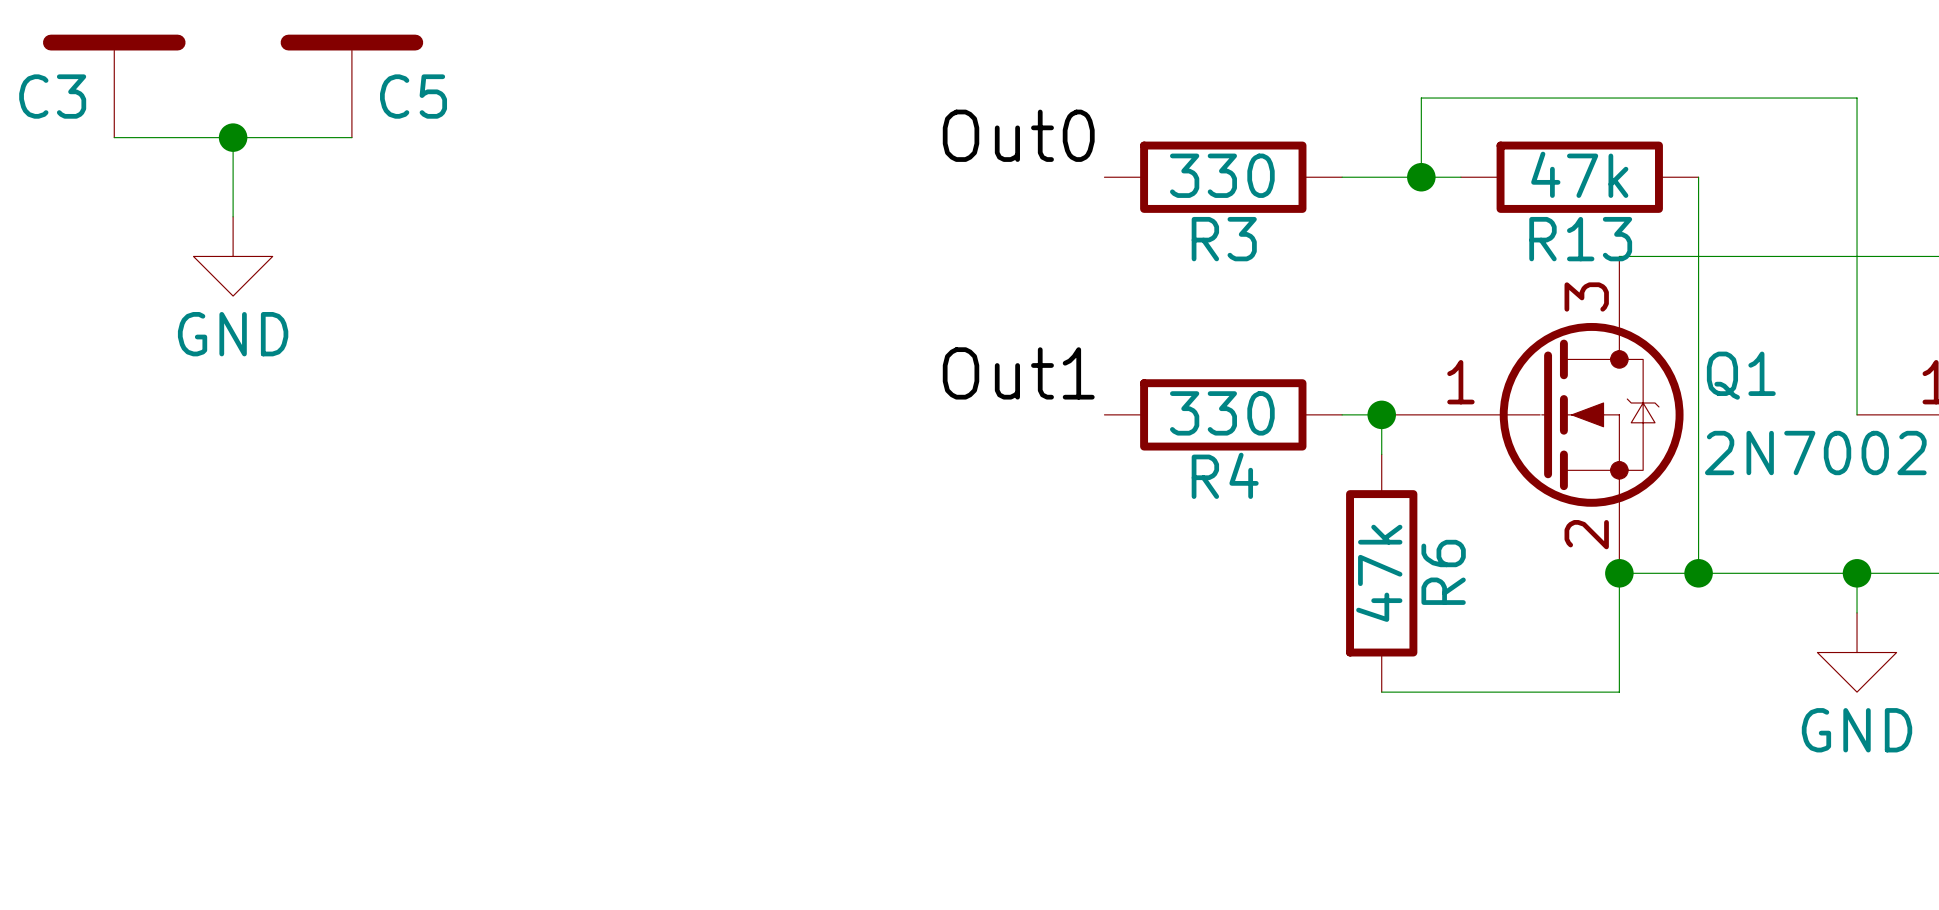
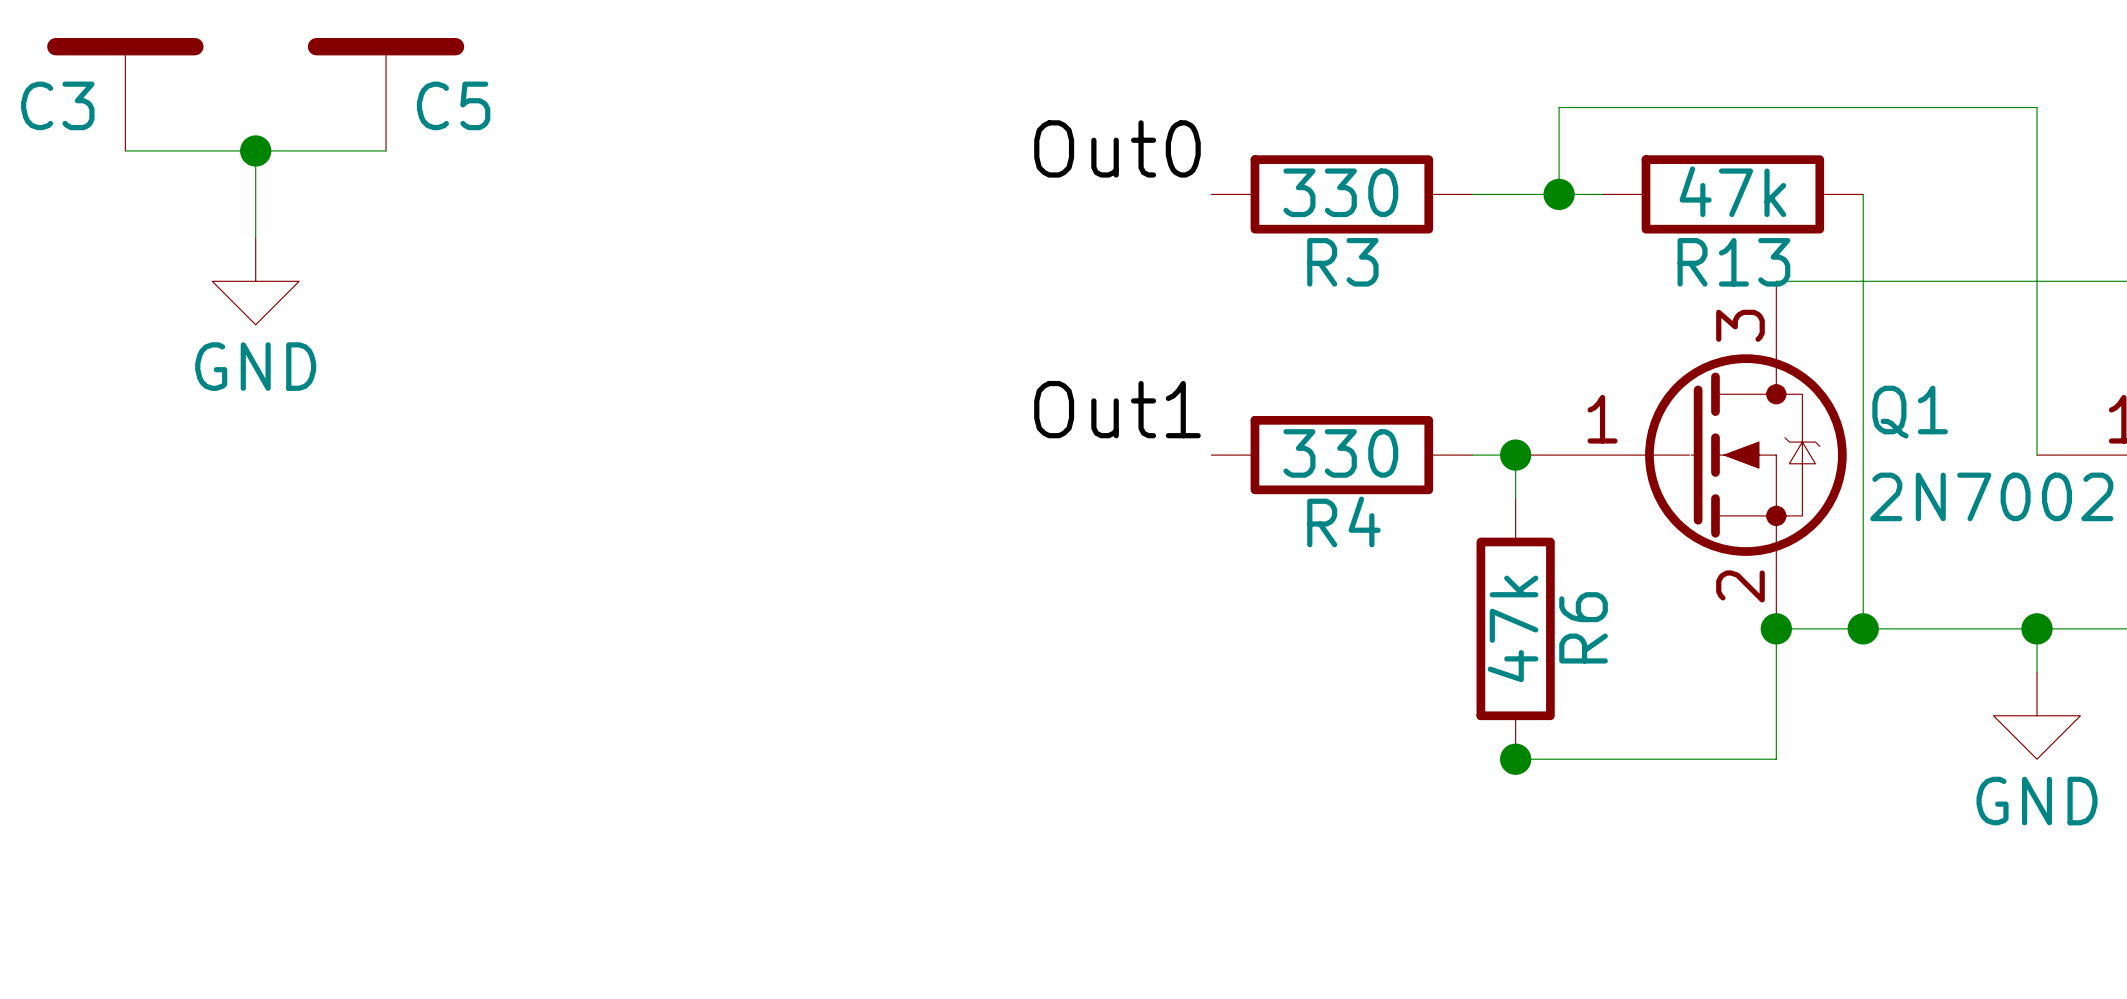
junction: none -> (1515, 759)

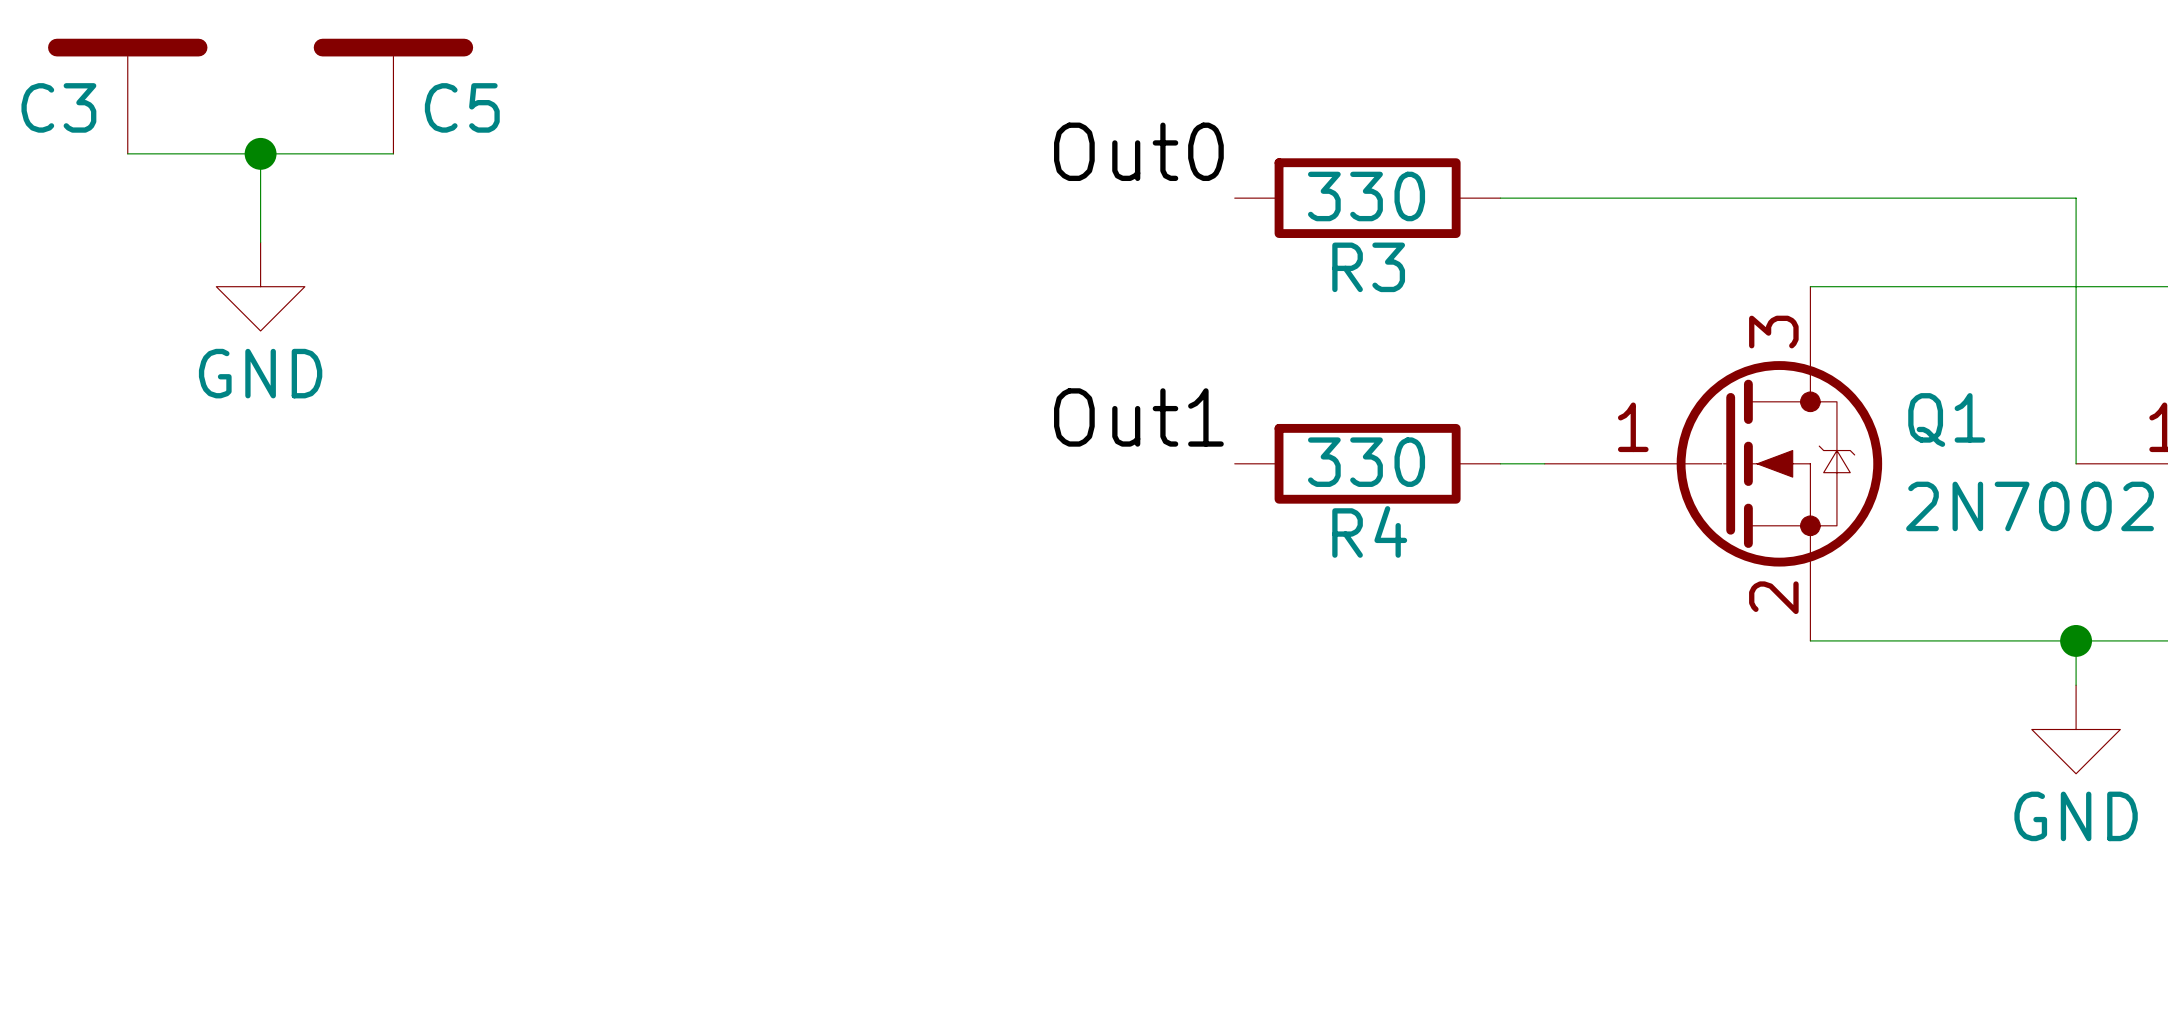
wire: (1559, 194) (1559, 107) (2037, 107) (2037, 194) -> (1633, 198) (2076, 198)
junction: (1559, 194) -> none
R13: 47k (1732, 194) -> none
wire: (1863, 194) (1863, 628) -> none
wire: (1515, 455) (1515, 498) -> none
junction: (1515, 455) -> none
R6: 47k (1515, 628) -> none
wire: (1776, 628) (1776, 759) (1515, 759) -> none
junction: (1776, 628) -> none
junction: (1863, 628) -> none
junction: (1515, 759) -> none

